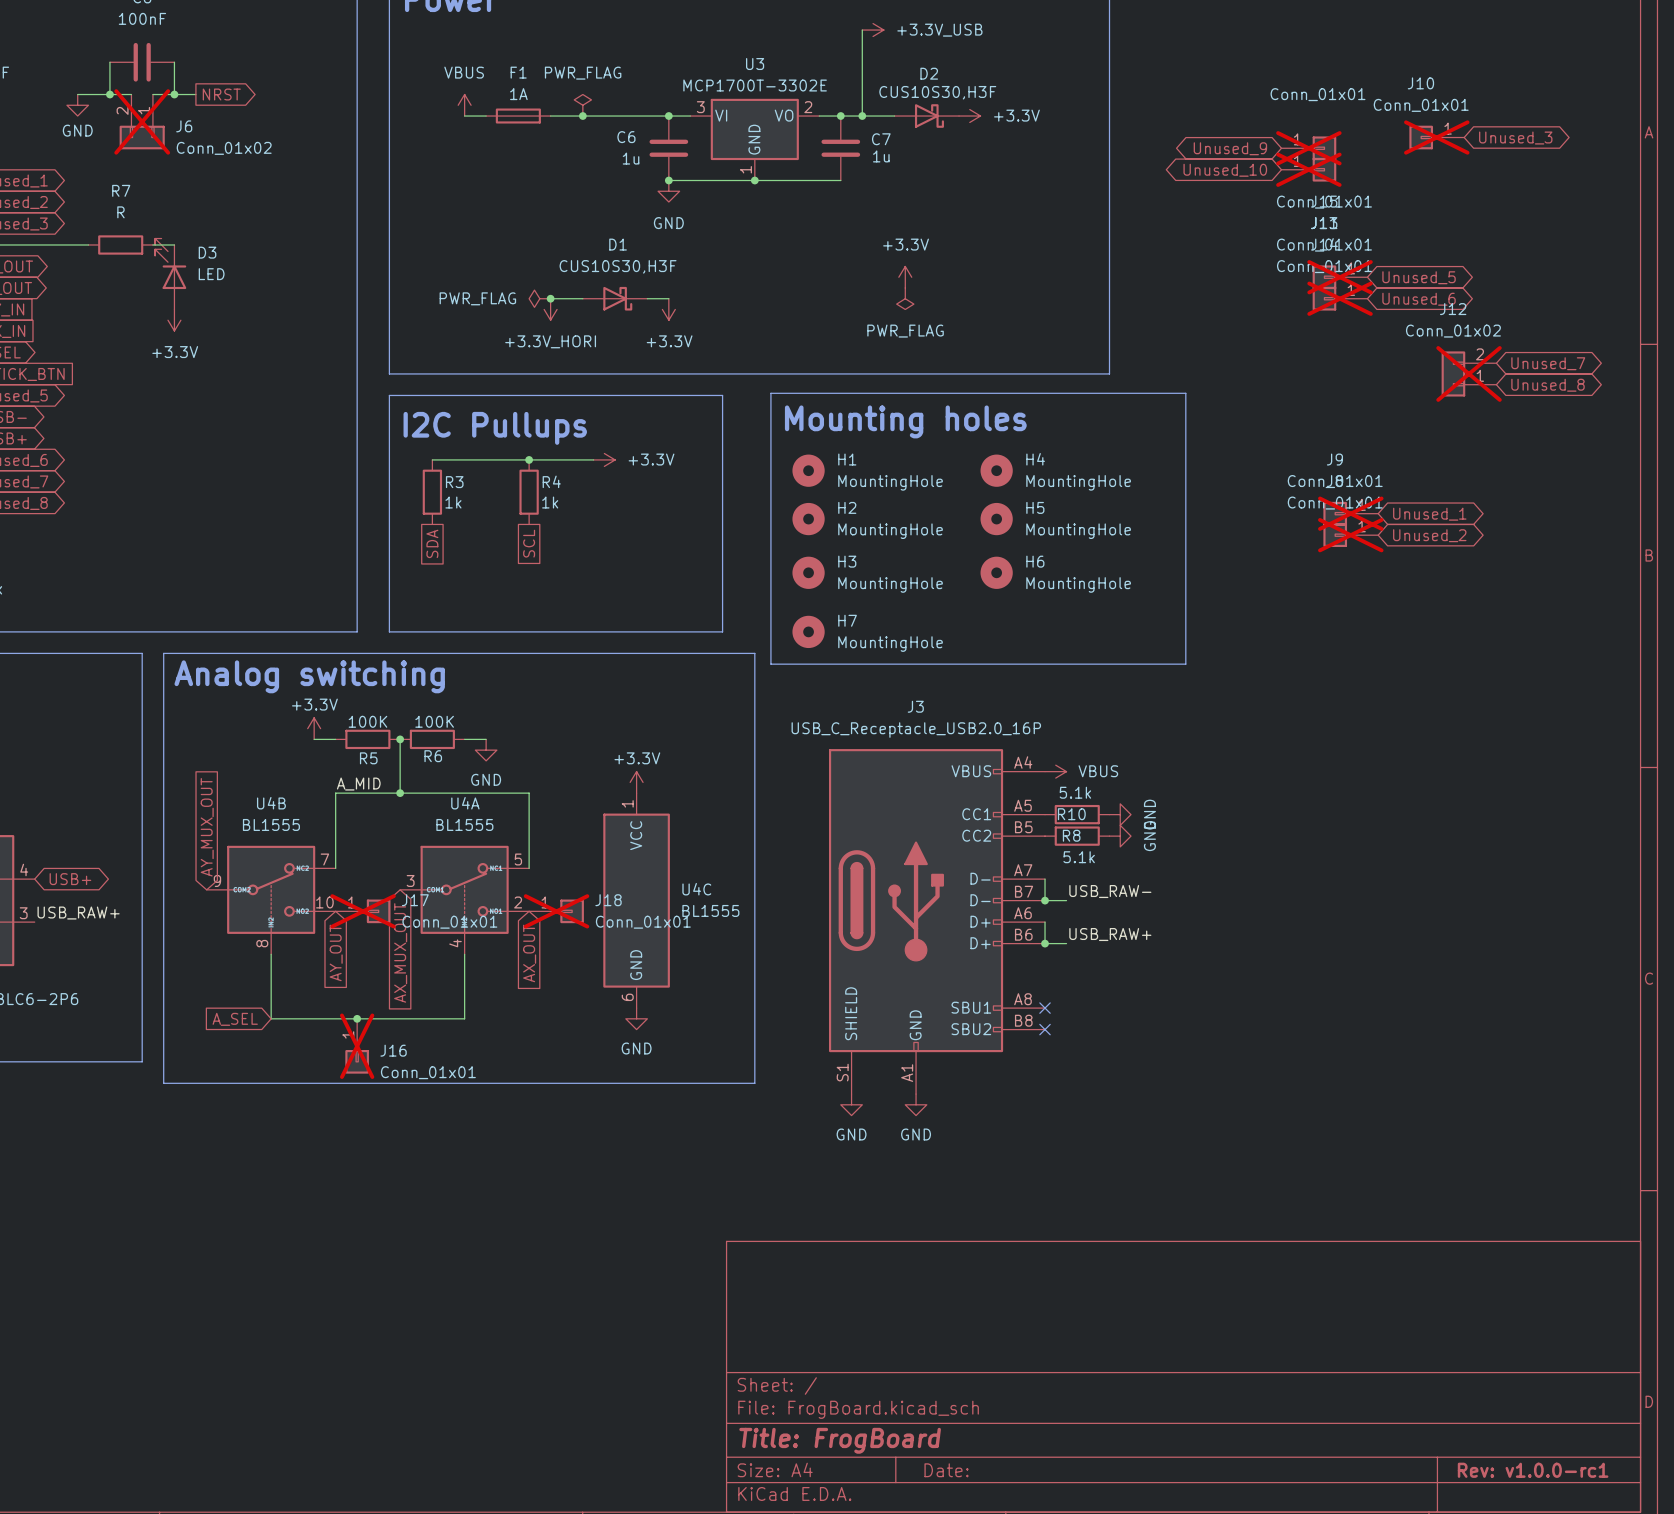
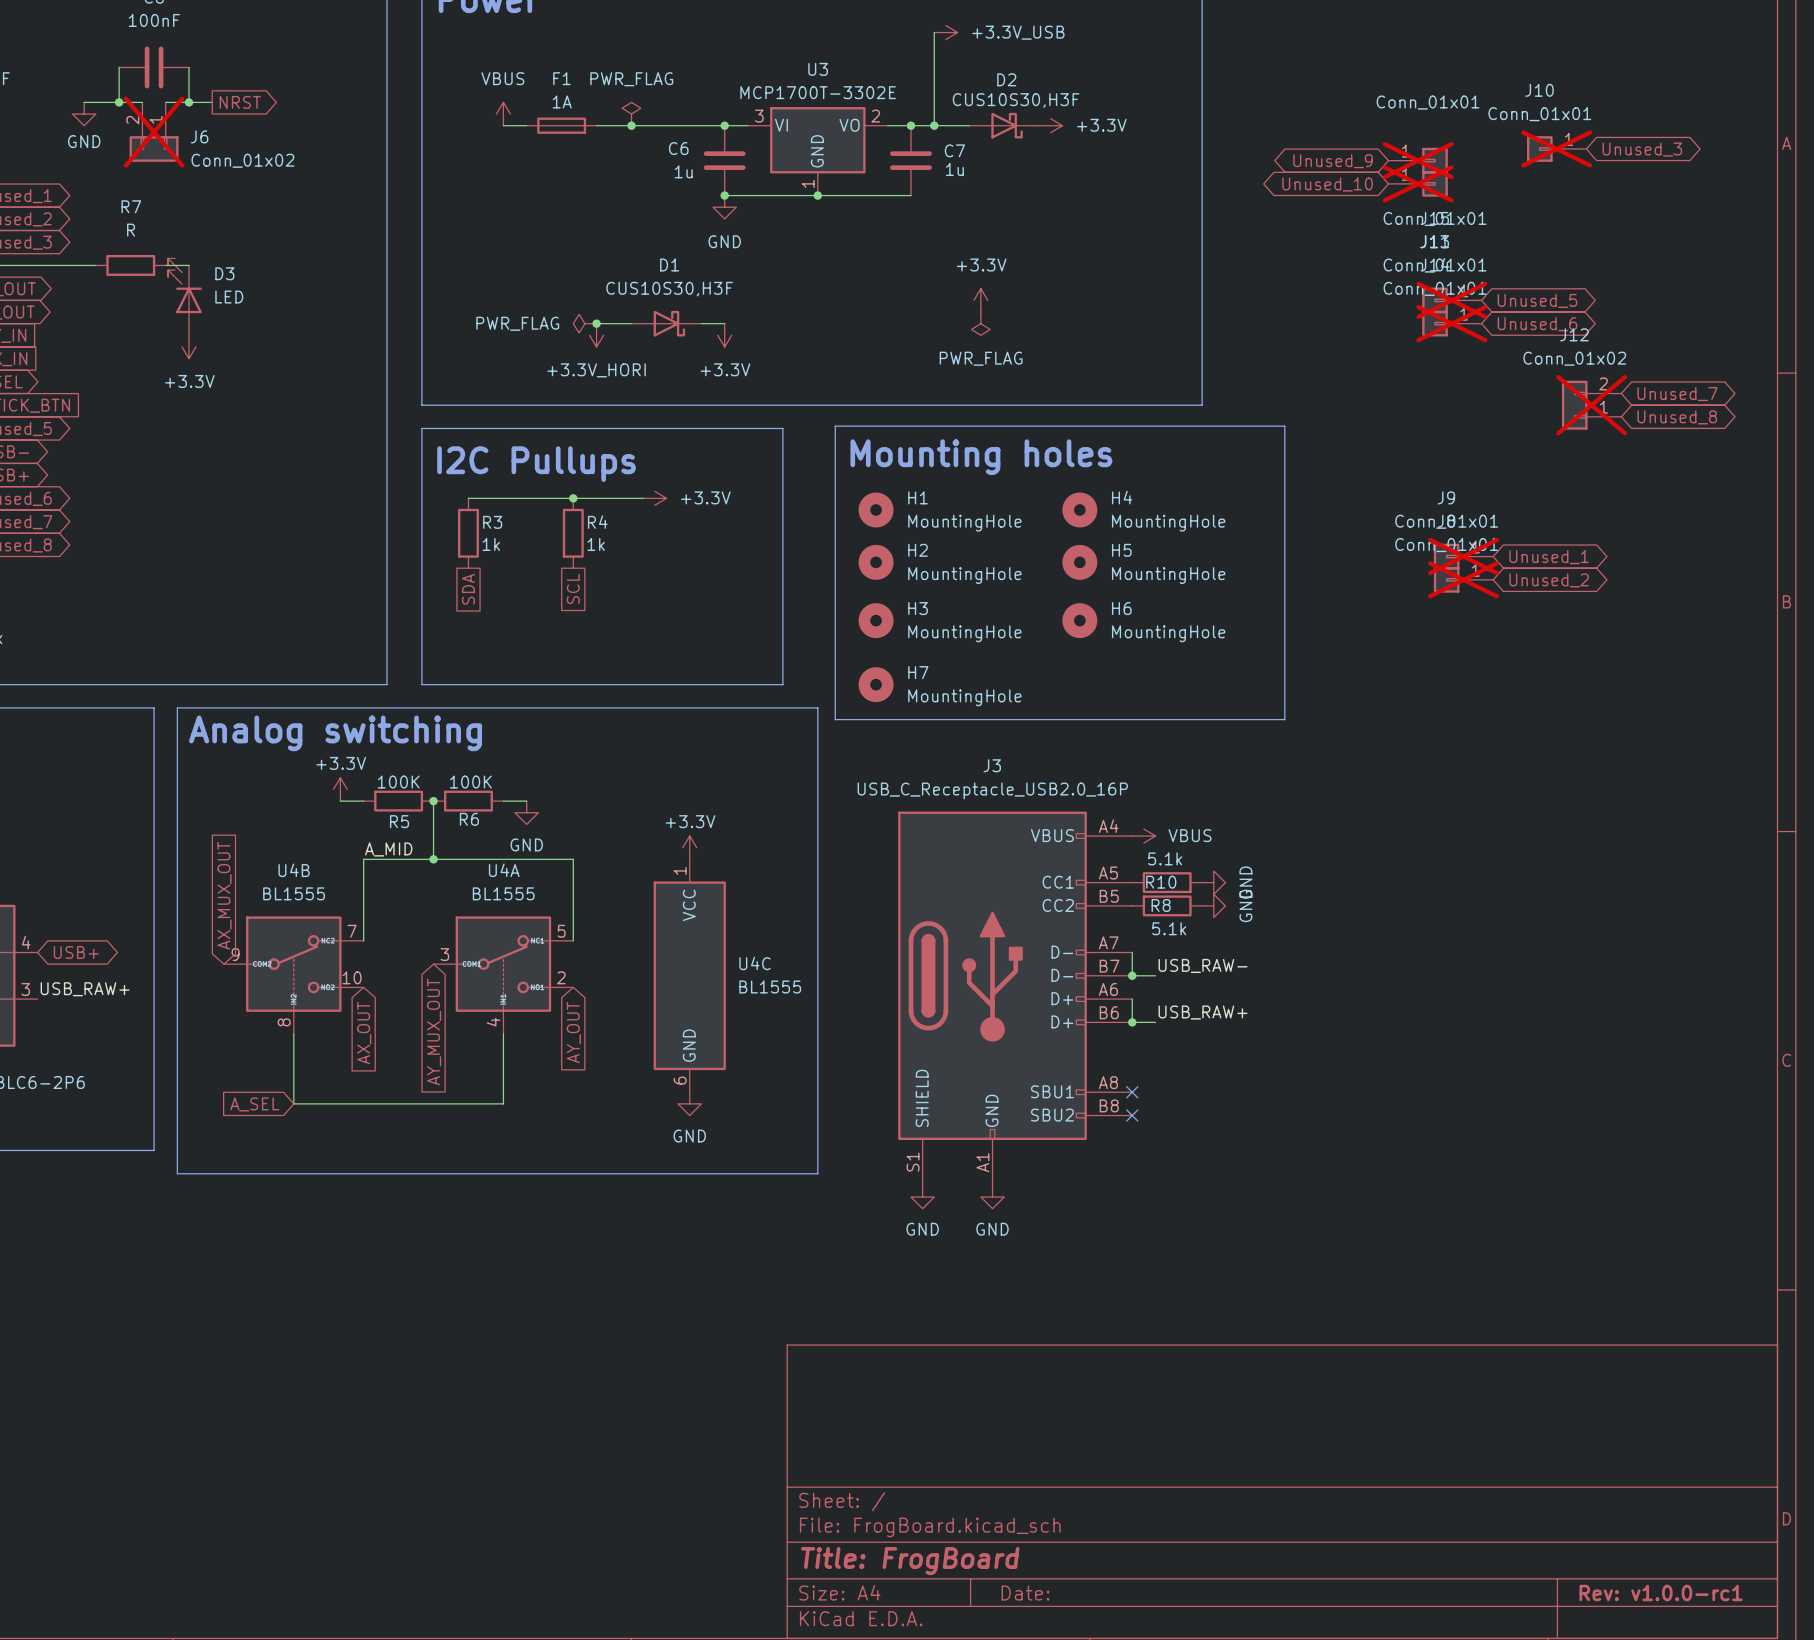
global label: AY_MUX_OUT (207, 827) -> AX_MUX_OUT (224, 895)
J17: Conn_01x01 (363, 911) -> none
J18: Conn_01x01 (556, 911) -> none
global label: AY_OUT (336, 952) -> AX_OUT (364, 1033)
global label: AX_MUX_OUT (400, 952) -> AY_MUX_OUT (434, 1031)
global label: AX_OUT (529, 953) -> AY_OUT (573, 1032)
junction: (357, 1018) -> none
J16: Conn_01x01 (357, 1046) -> none

